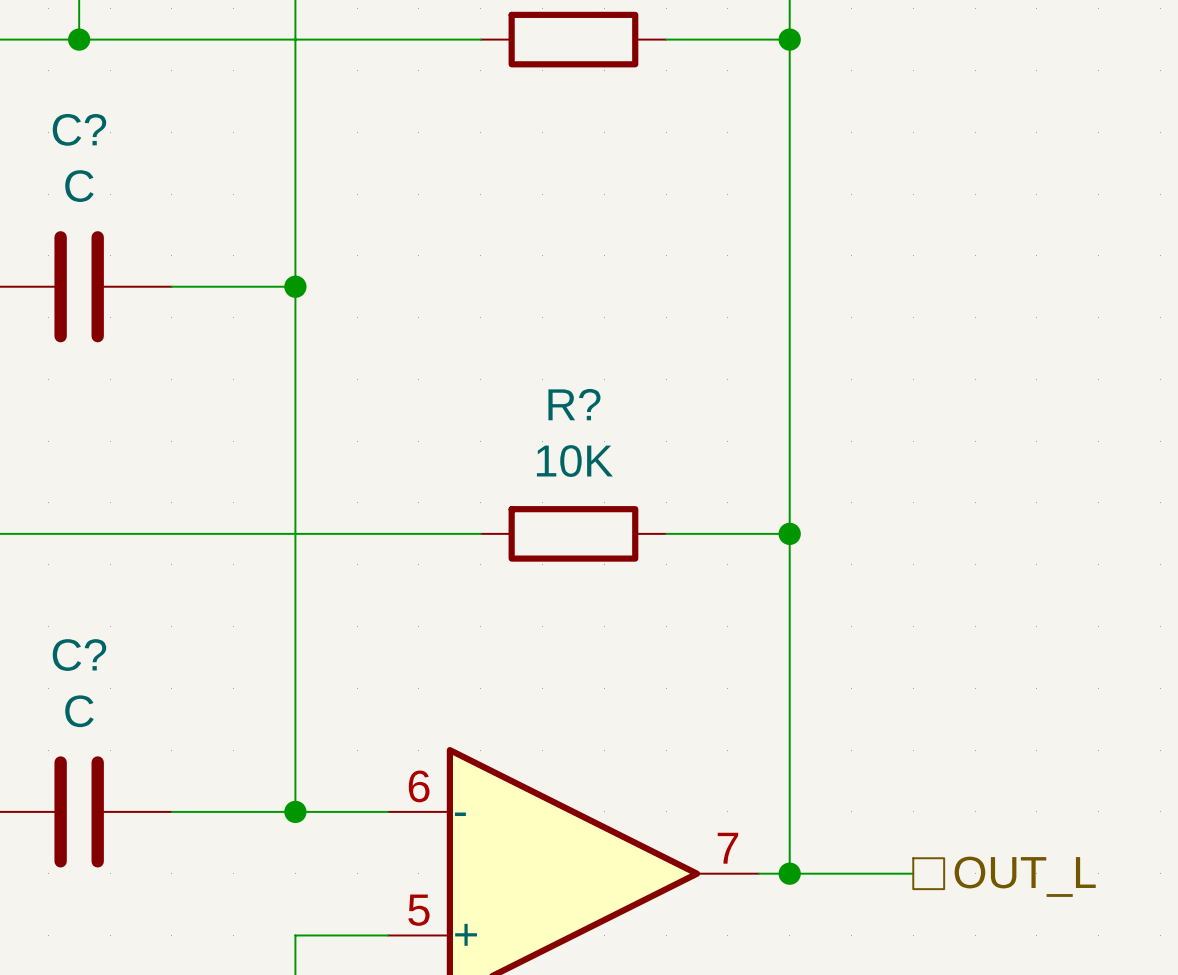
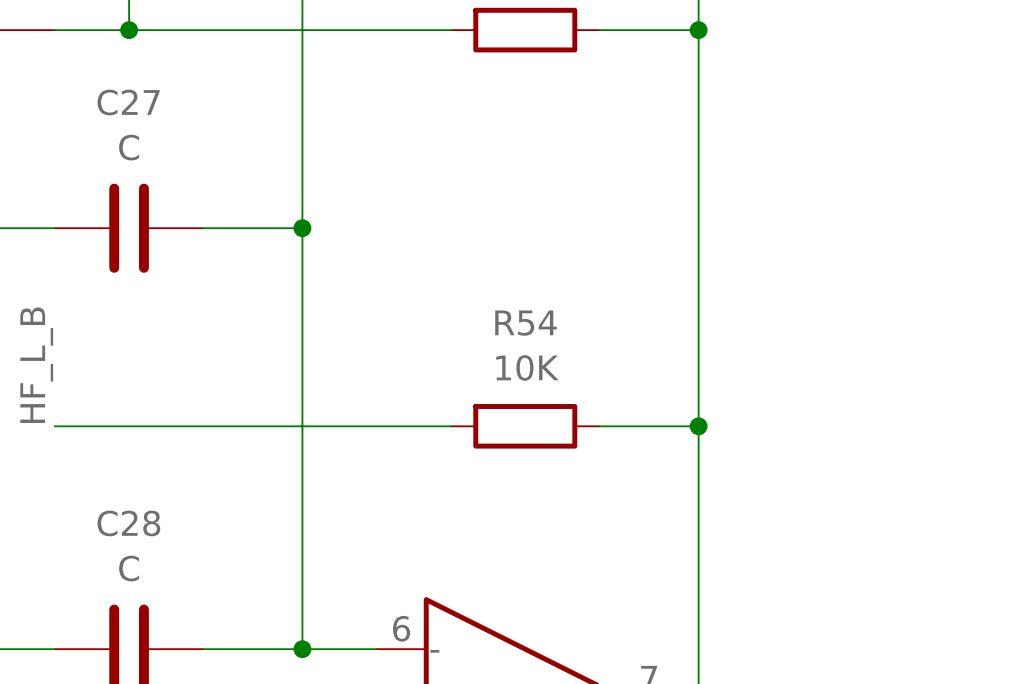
C? name: C? (79, 129) -> C27 (128, 102)
R? name: R? (574, 404) -> R54 (526, 323)
C? name: C? (79, 655) -> C28 (128, 523)

